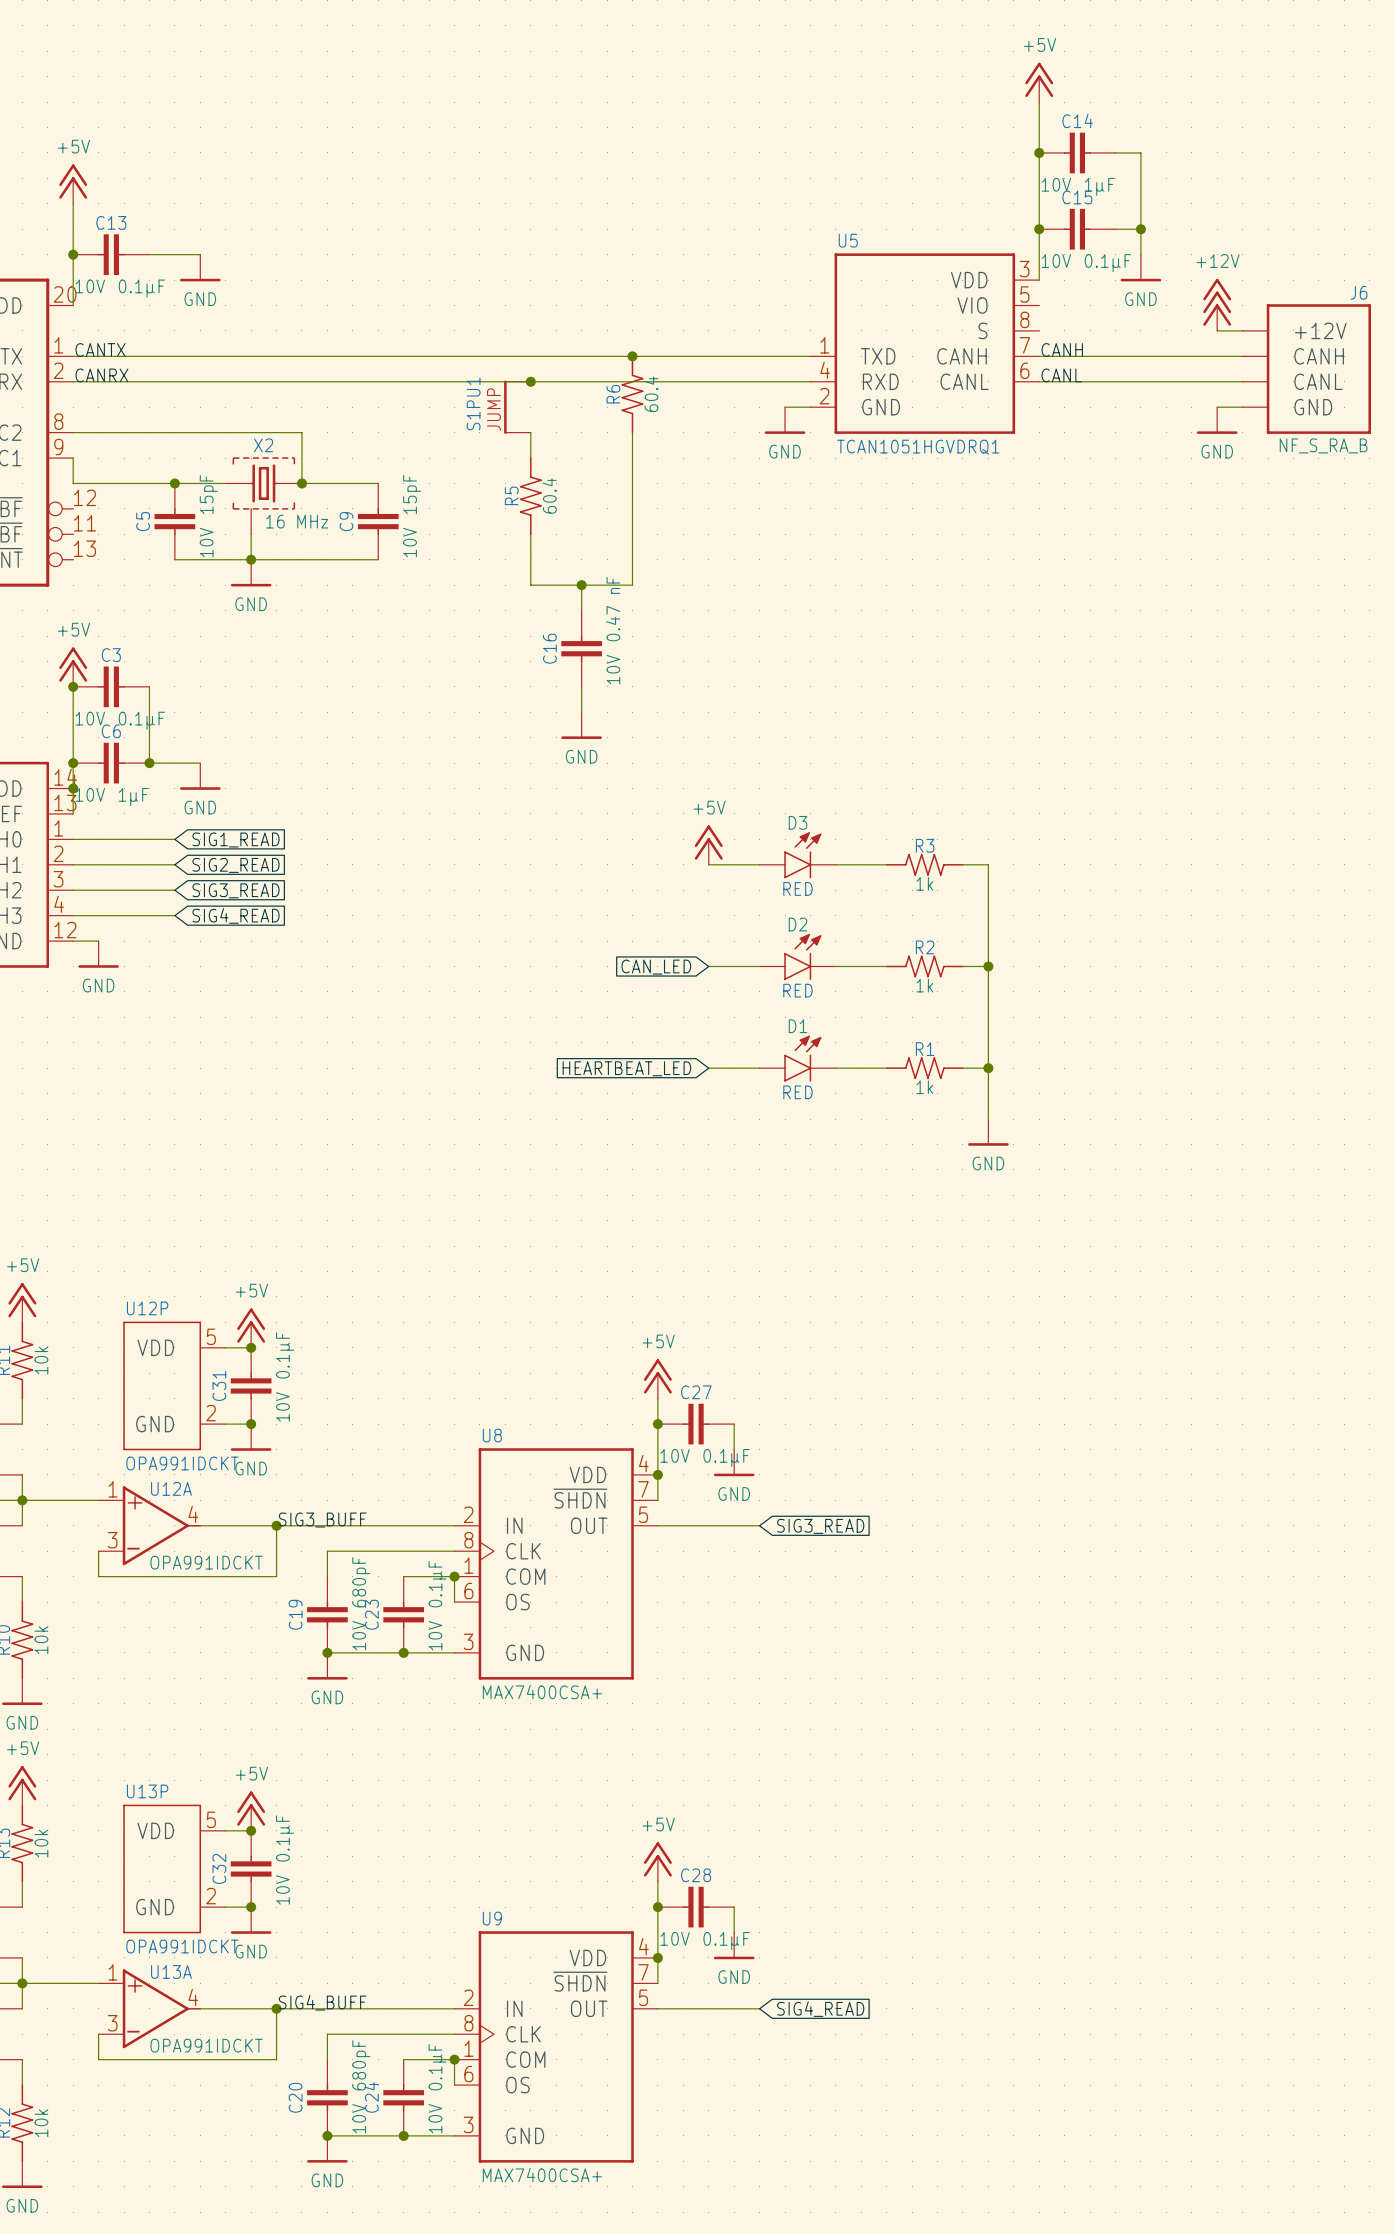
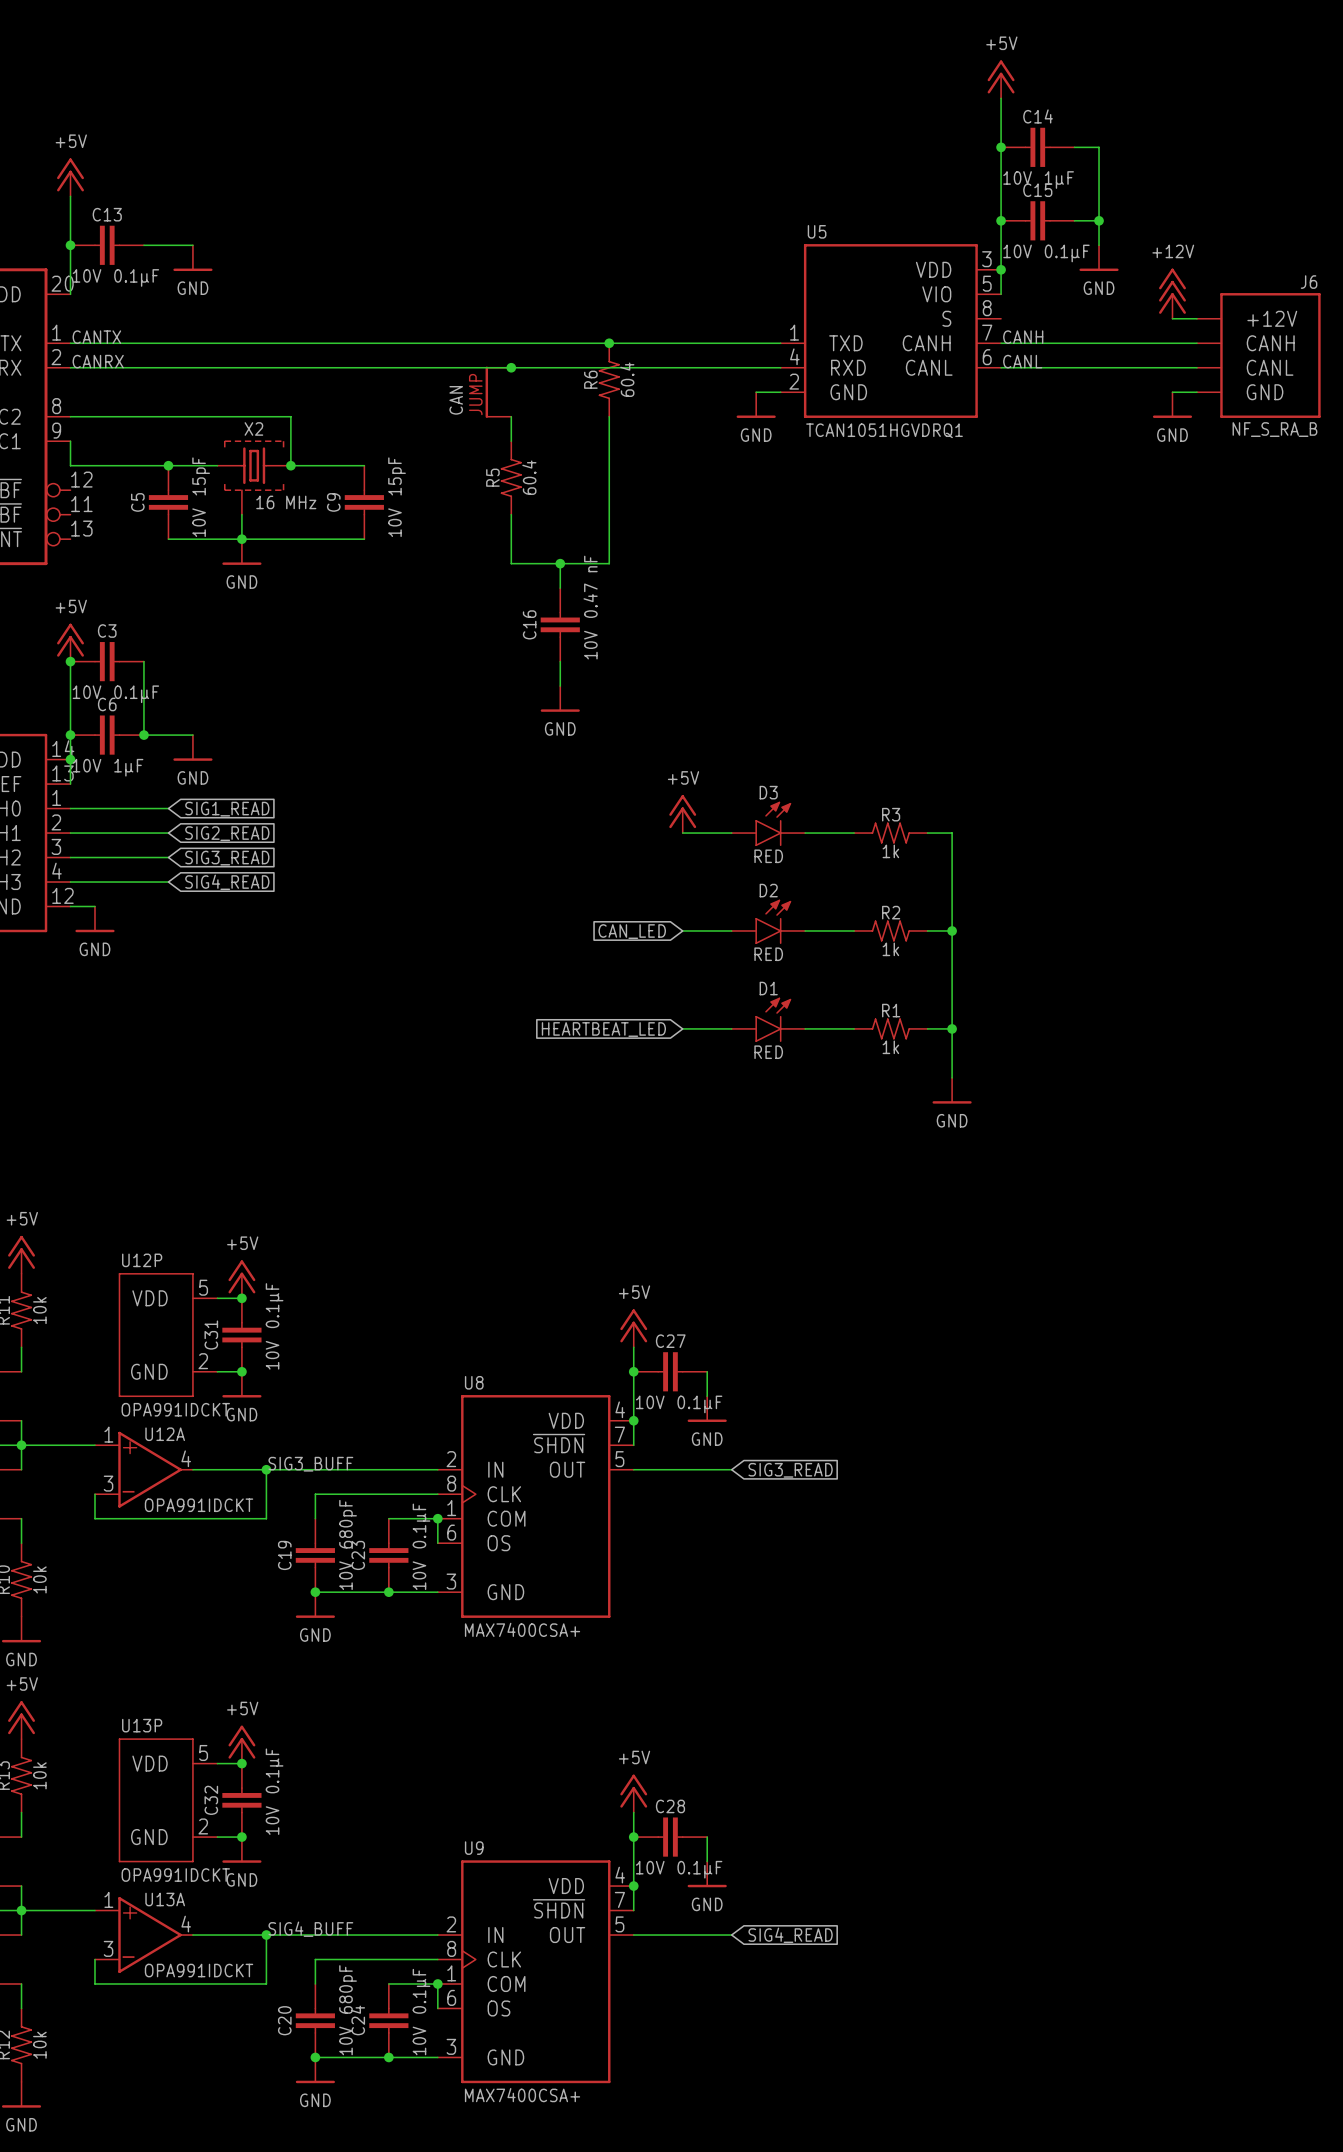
wire: none -> (1001, 269) (1001, 294)
junction: none -> (1001, 269)
S1PU1 name: S1PU1 (473, 403) -> CAN (456, 400)

